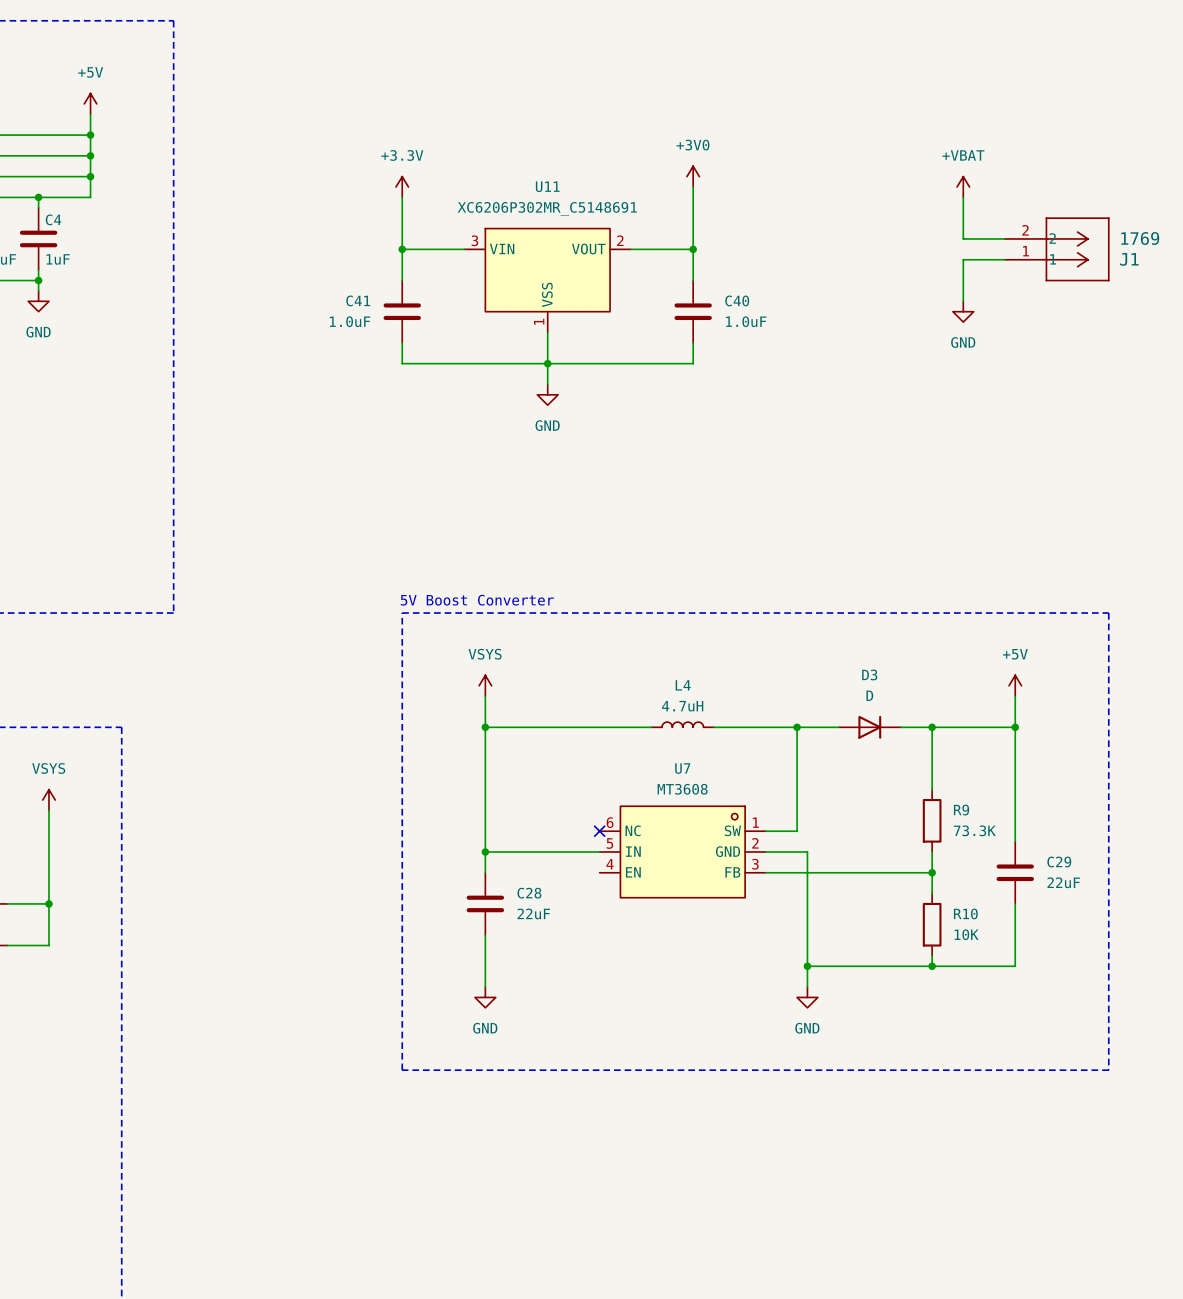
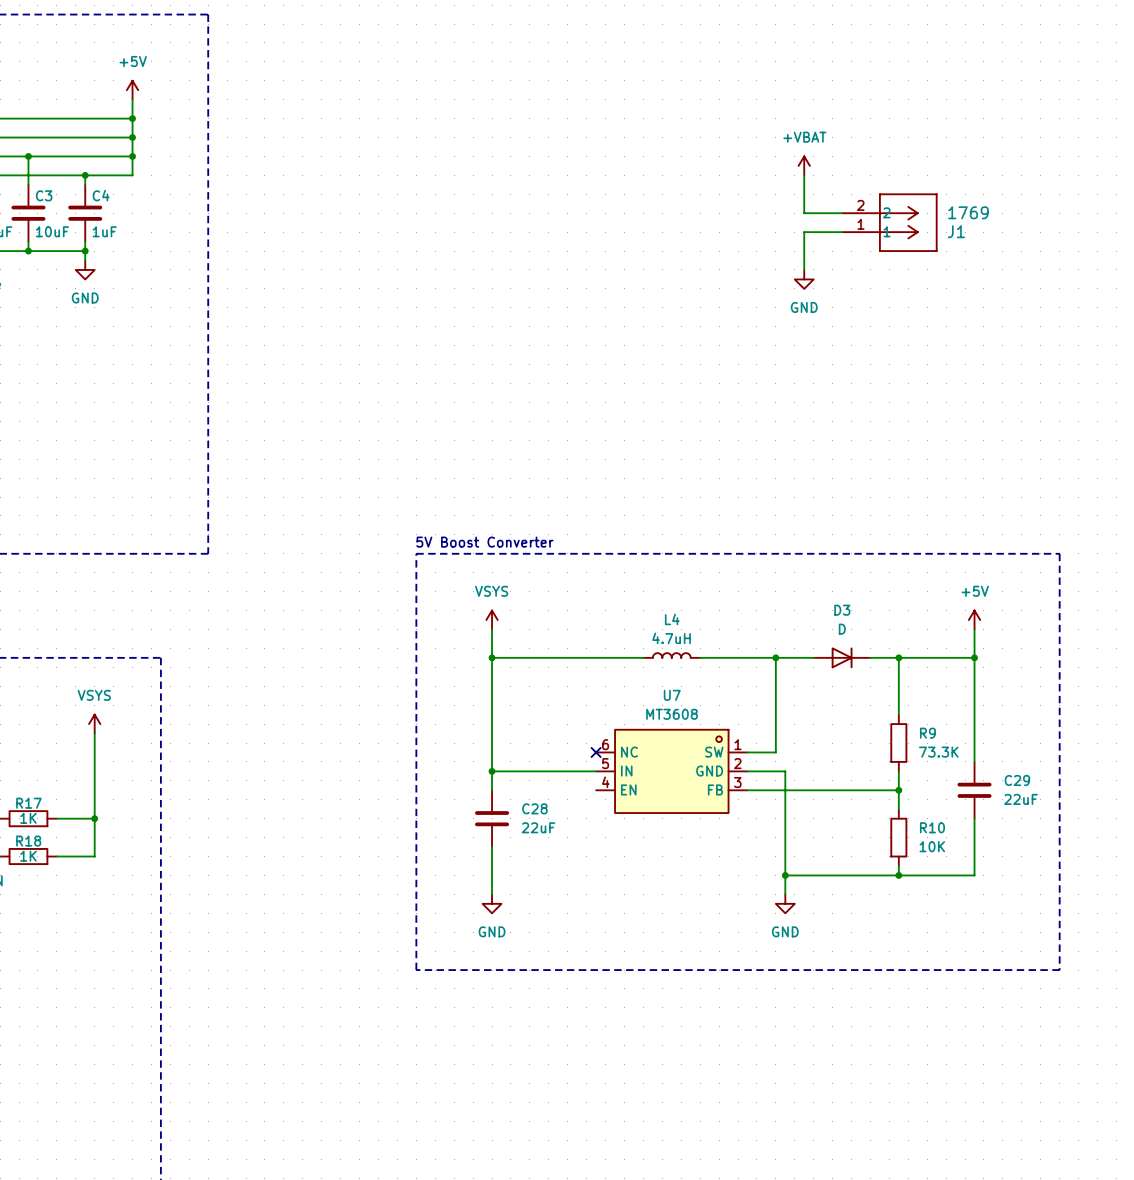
power symbol: +3V0 (693, 176) -> none
power symbol: +3.3V (402, 187) -> none
wire: (693, 187) (693, 280) -> none
power symbol position: +VBAT (963, 187) -> +VBAT (804, 165)
wire: (402, 197) (402, 280) -> none
wire: (963, 197) (963, 238) (1004, 238) -> (804, 175) (804, 213) (842, 213)
wire: (402, 249) (464, 249) -> none
junction: (402, 249) -> none
wire: (630, 249) (693, 249) -> none
junction: (693, 249) -> none
J1 position: (1057, 249) -> (889, 222)
wire: (1004, 259) (963, 259) (963, 301) -> (842, 232) (804, 232) (804, 269)
U11: XC6206P302MR_C5148691 (547, 280) -> none
C41: 1.0uF (402, 311) -> none
C40: 1.0uF (693, 311) -> none
power symbol position: GND (963, 311) -> GND (804, 279)
wire: (547, 332) (547, 384) -> none
wire: (402, 342) (402, 363) (693, 363) (693, 342) -> none
junction: (547, 363) -> none
power symbol: GND (547, 394) -> none

